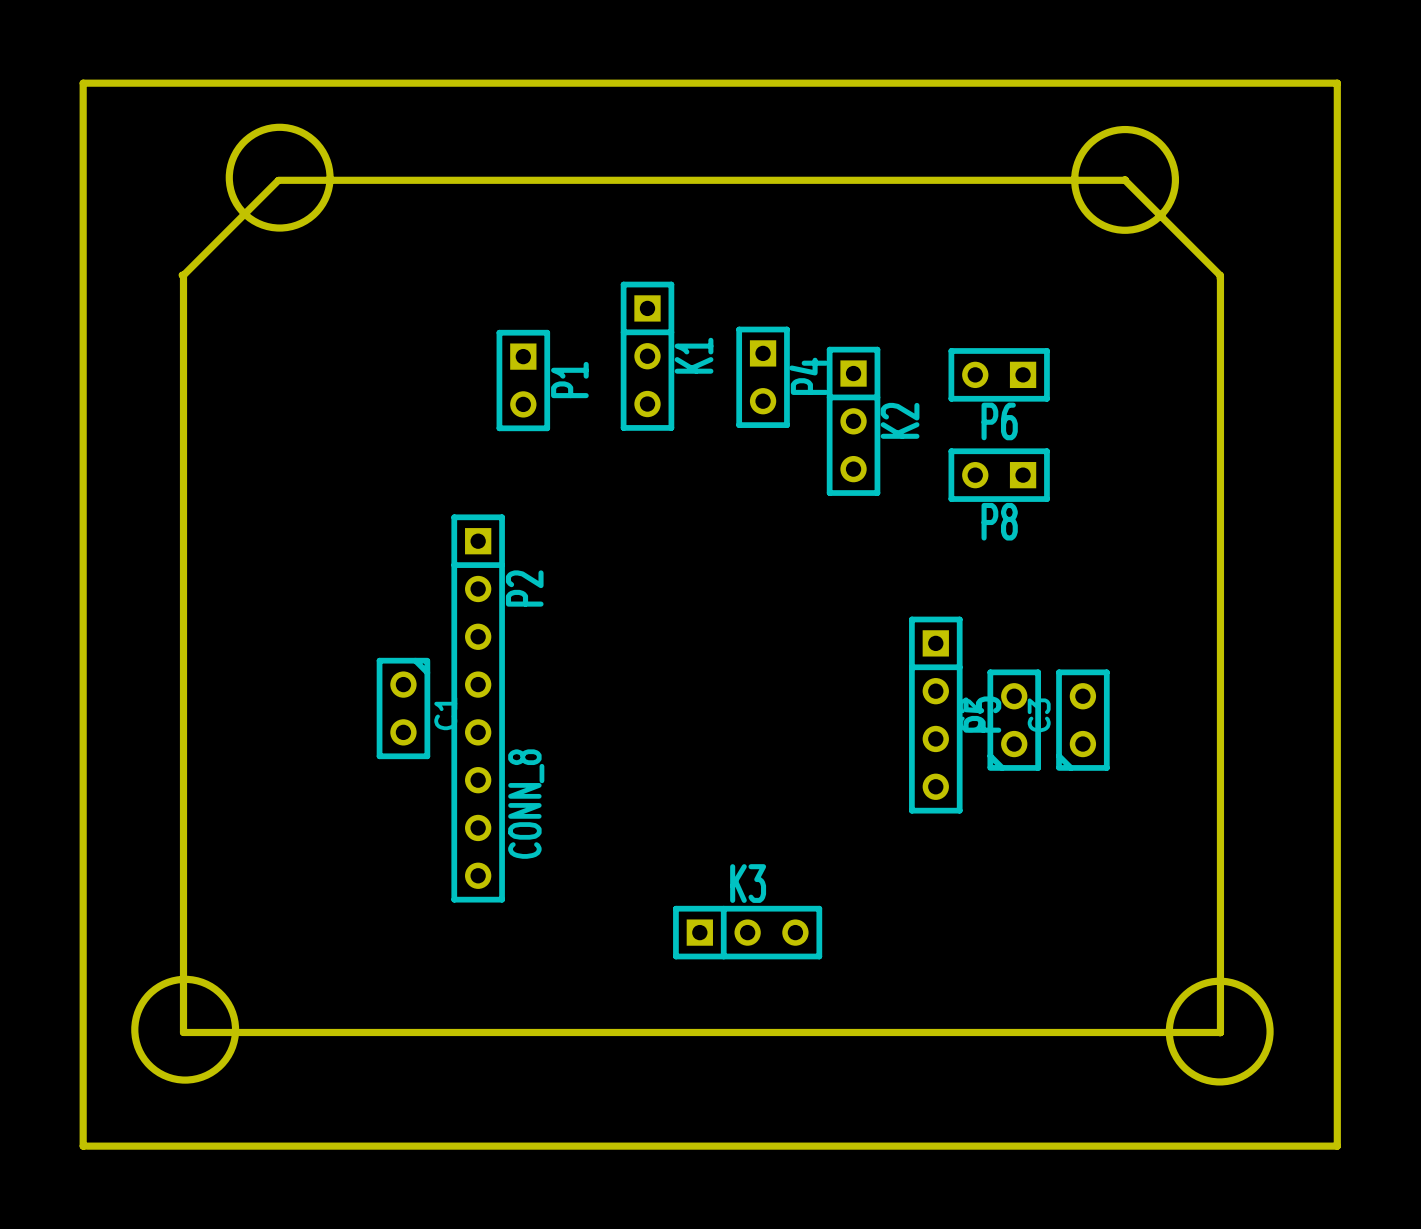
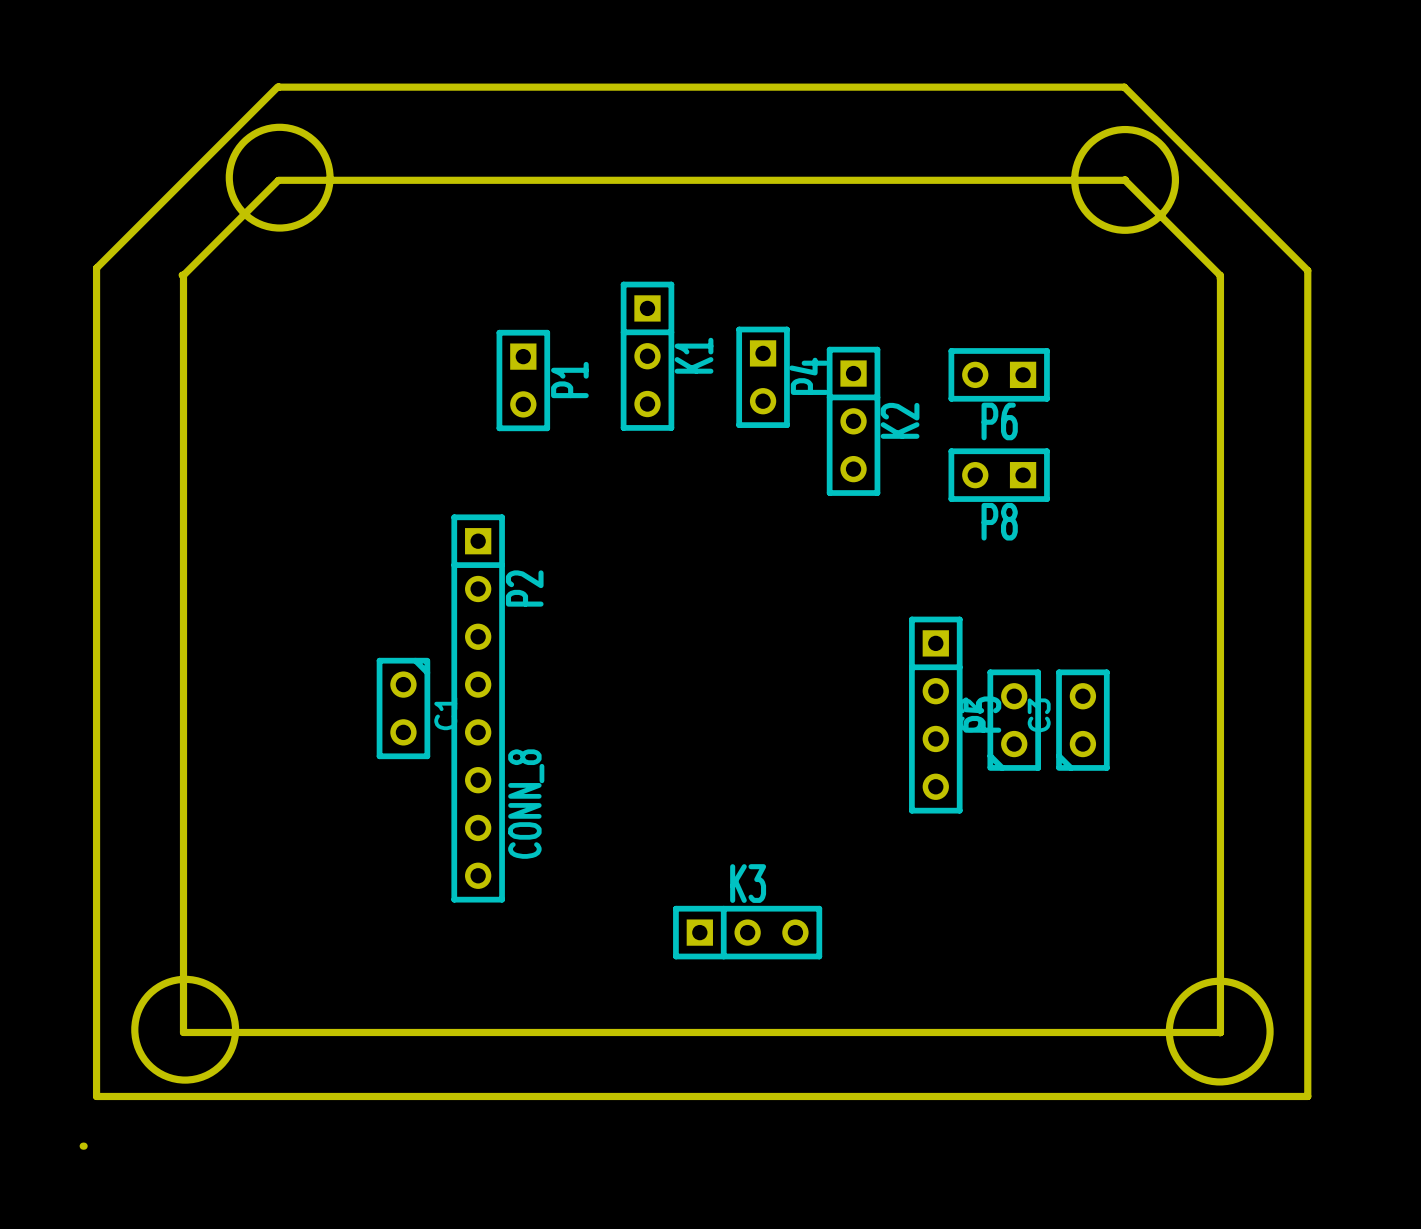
board edge: none -> (277, 86) (96, 268) (96, 1096) (1307, 1096) (1307, 270) (1124, 87) (278, 87)
board edge: (83, 1146) (83, 83) (1337, 83) (1337, 1146) (86, 1146) -> none

